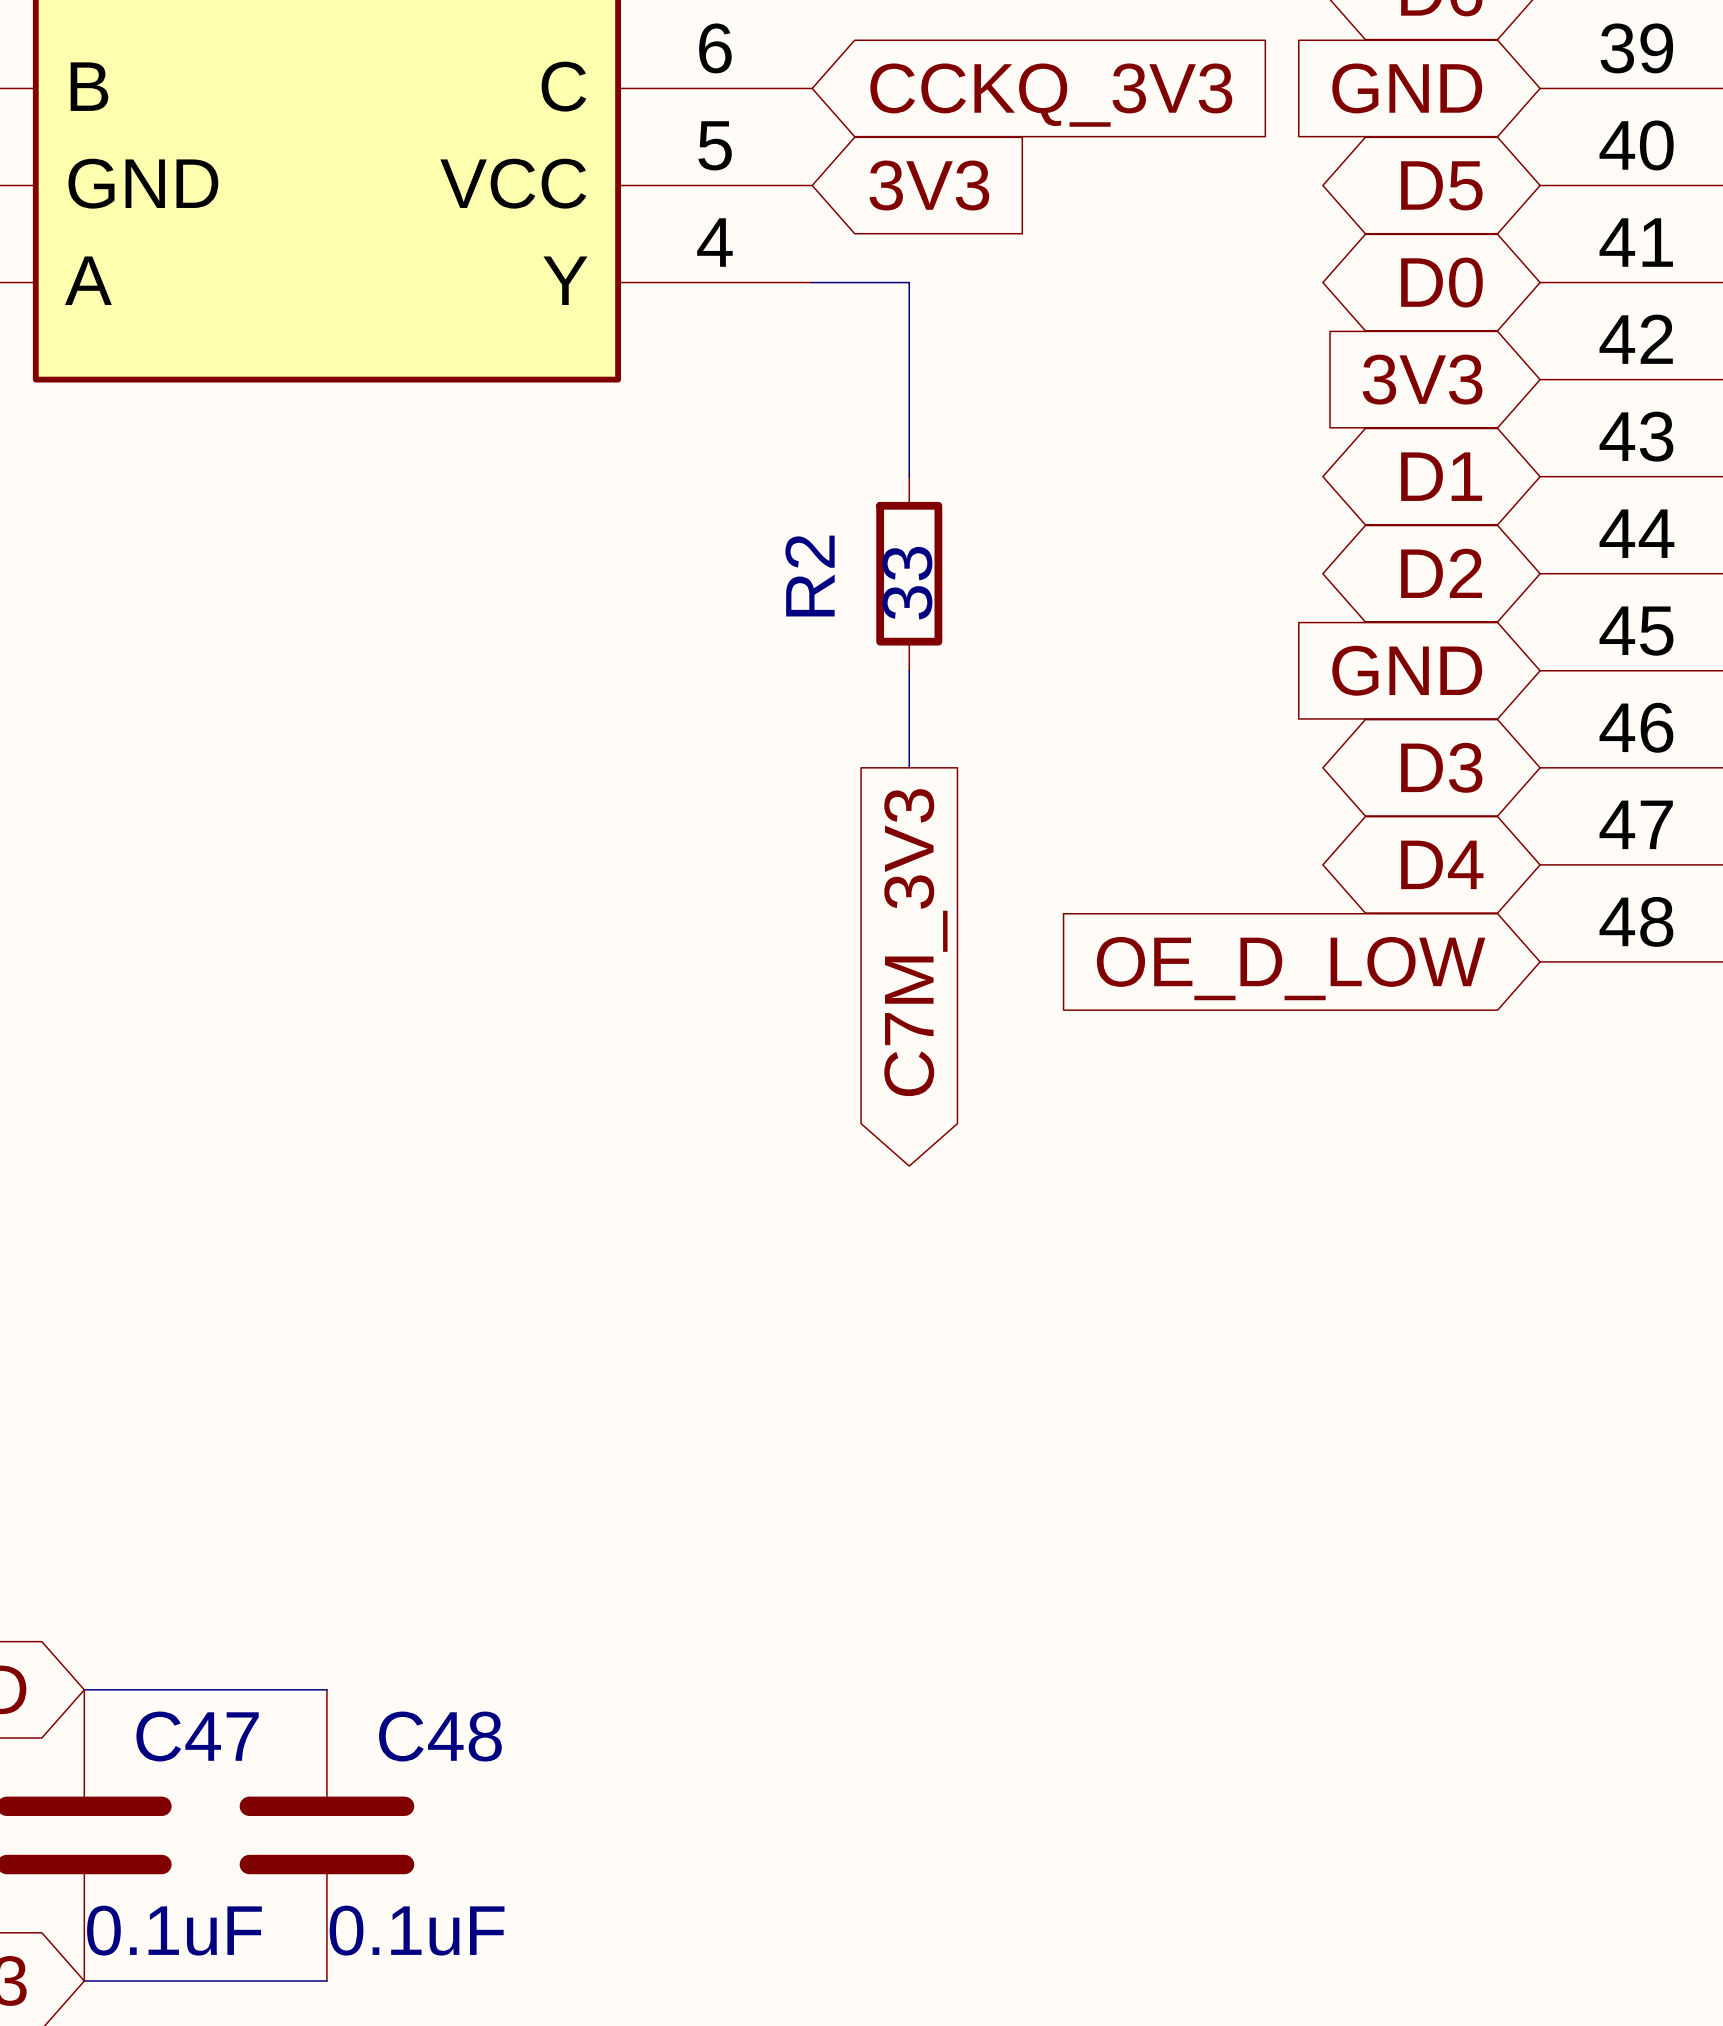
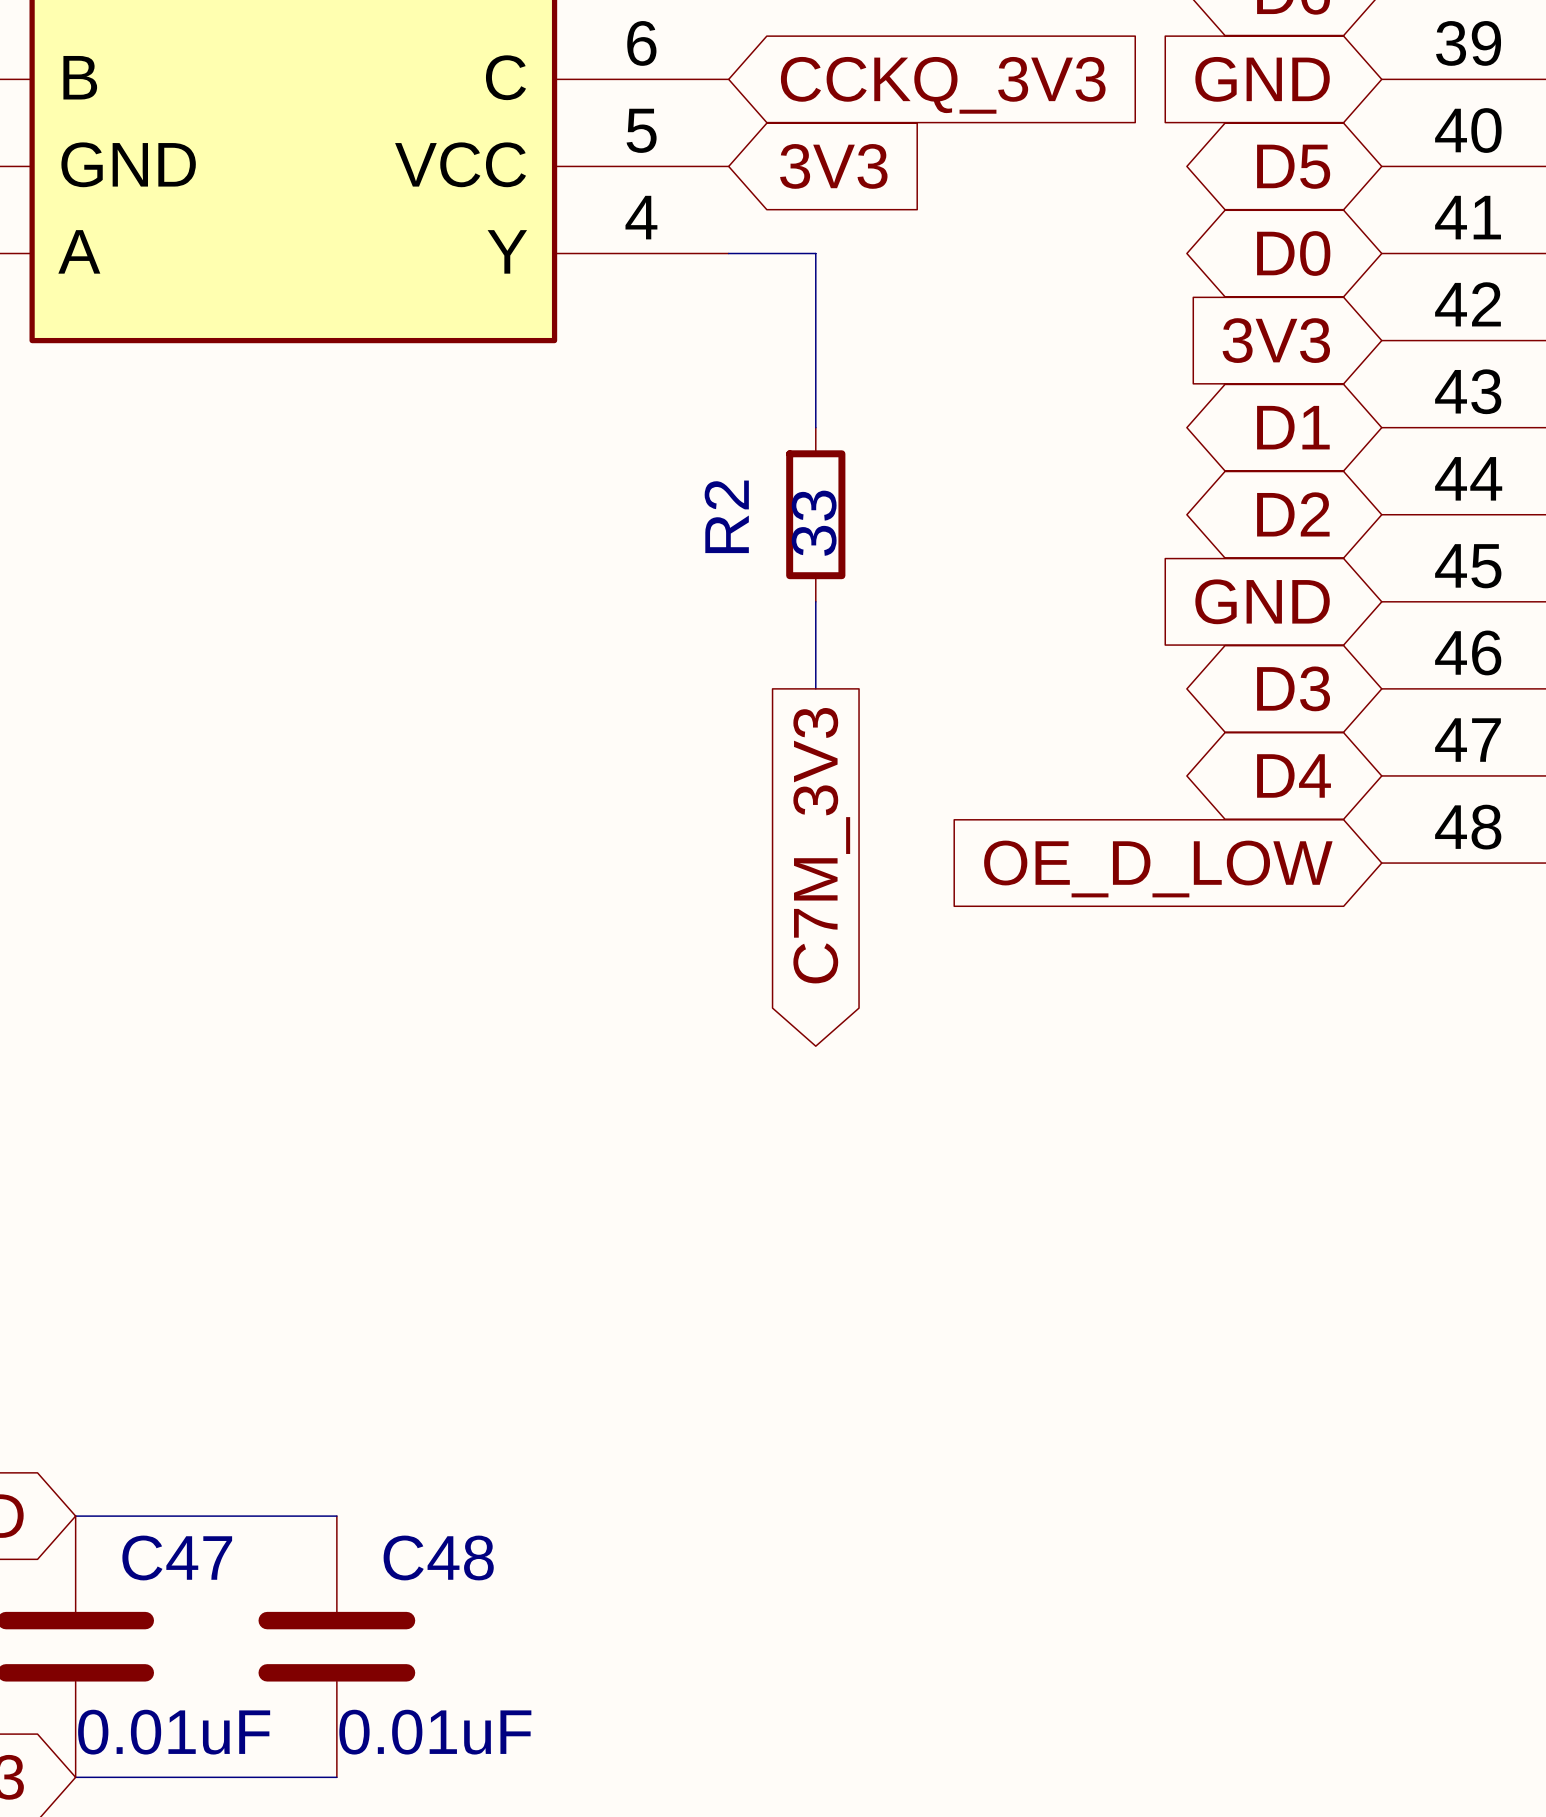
wire: none -> (293, 1516) (336, 1516)
C48 position: (326, 1835) -> (336, 1646)
C47 value: 0.1uF (174, 1930) -> 0.01uF (174, 1732)
C48 value: 0.1uF (417, 1930) -> 0.01uF (435, 1732)
wire: none -> (293, 1777) (336, 1777)

